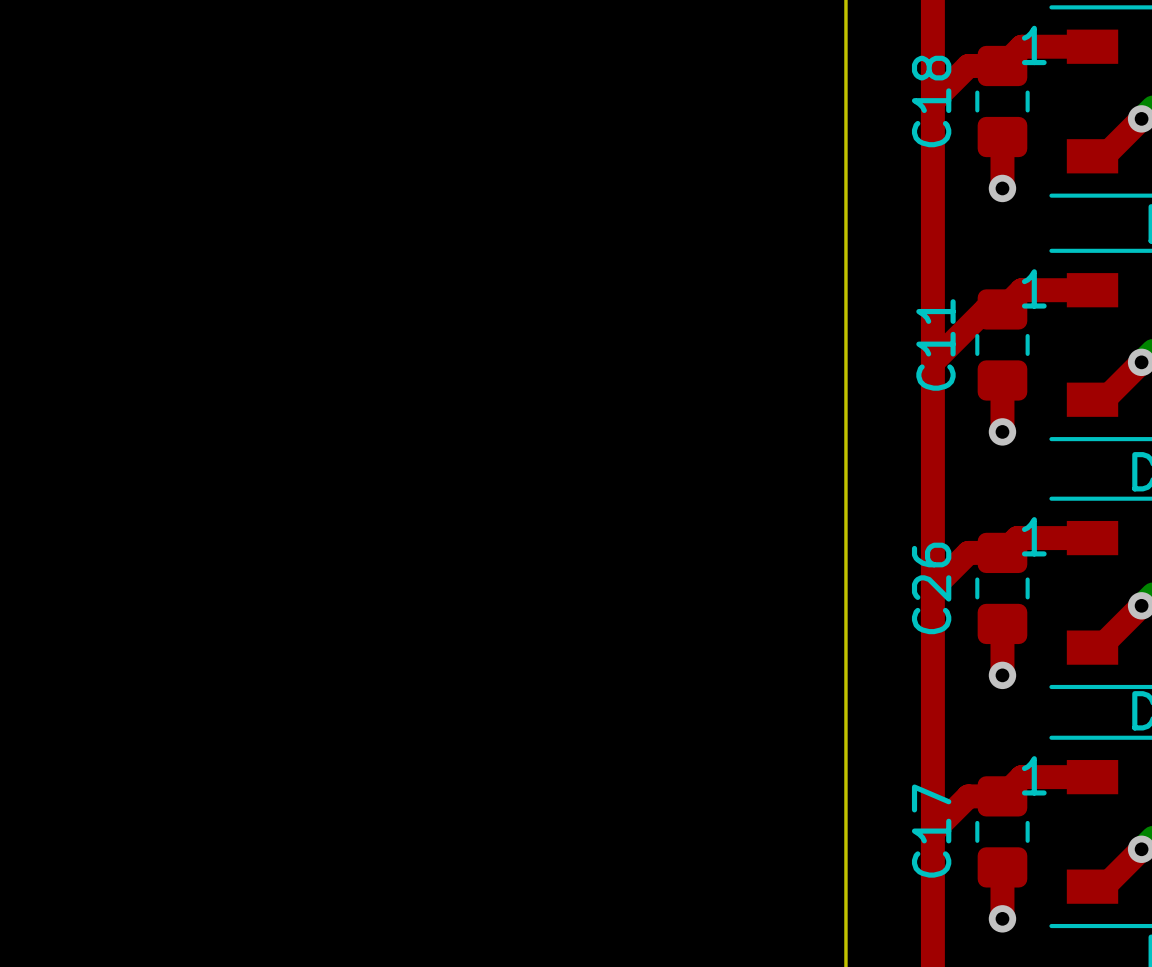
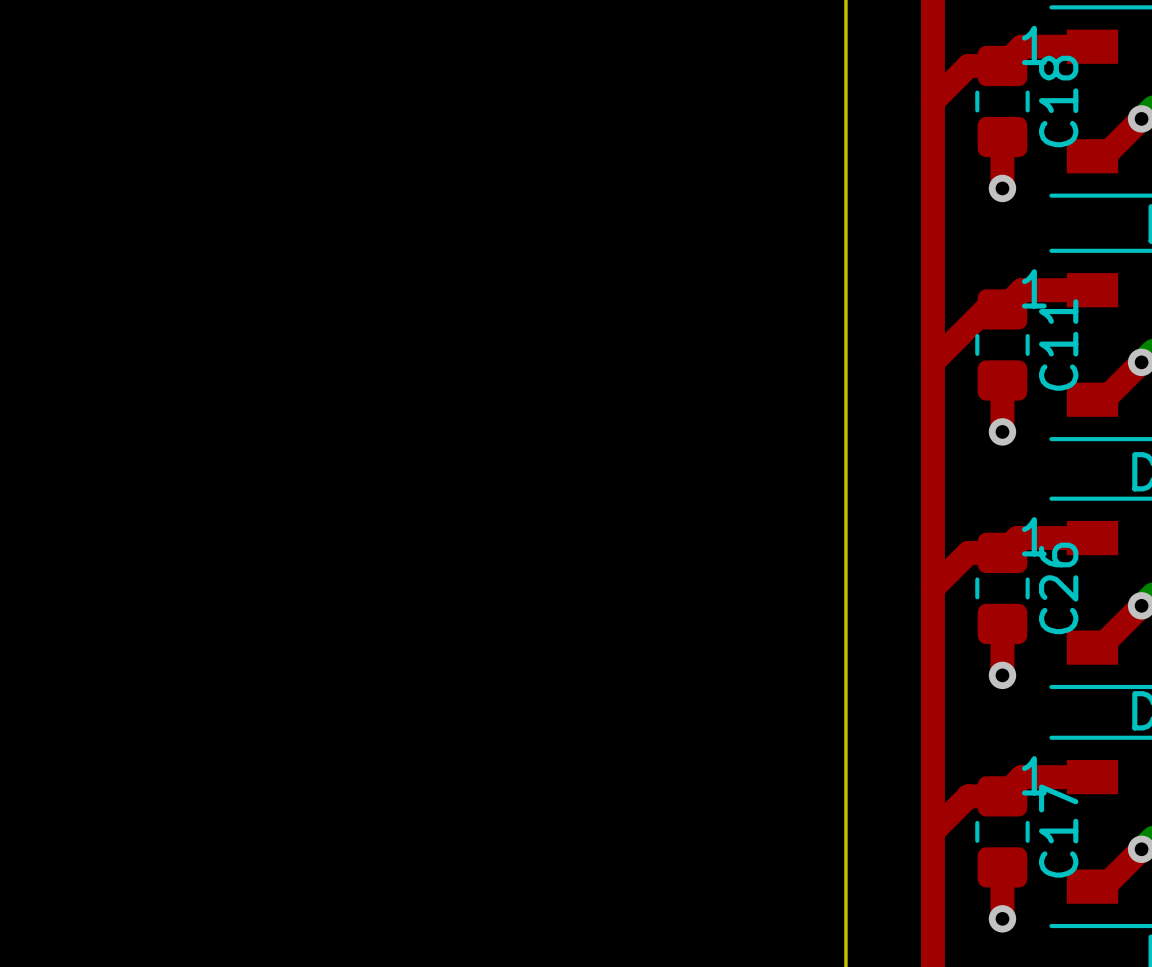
C18 name position: C18 (931, 101) -> C18 (1058, 101)
C11 name position: C11 (935, 344) -> C11 (1058, 344)
C26 name position: C26 (931, 588) -> C26 (1058, 588)
C17 name position: C17 (931, 831) -> C17 (1058, 831)

